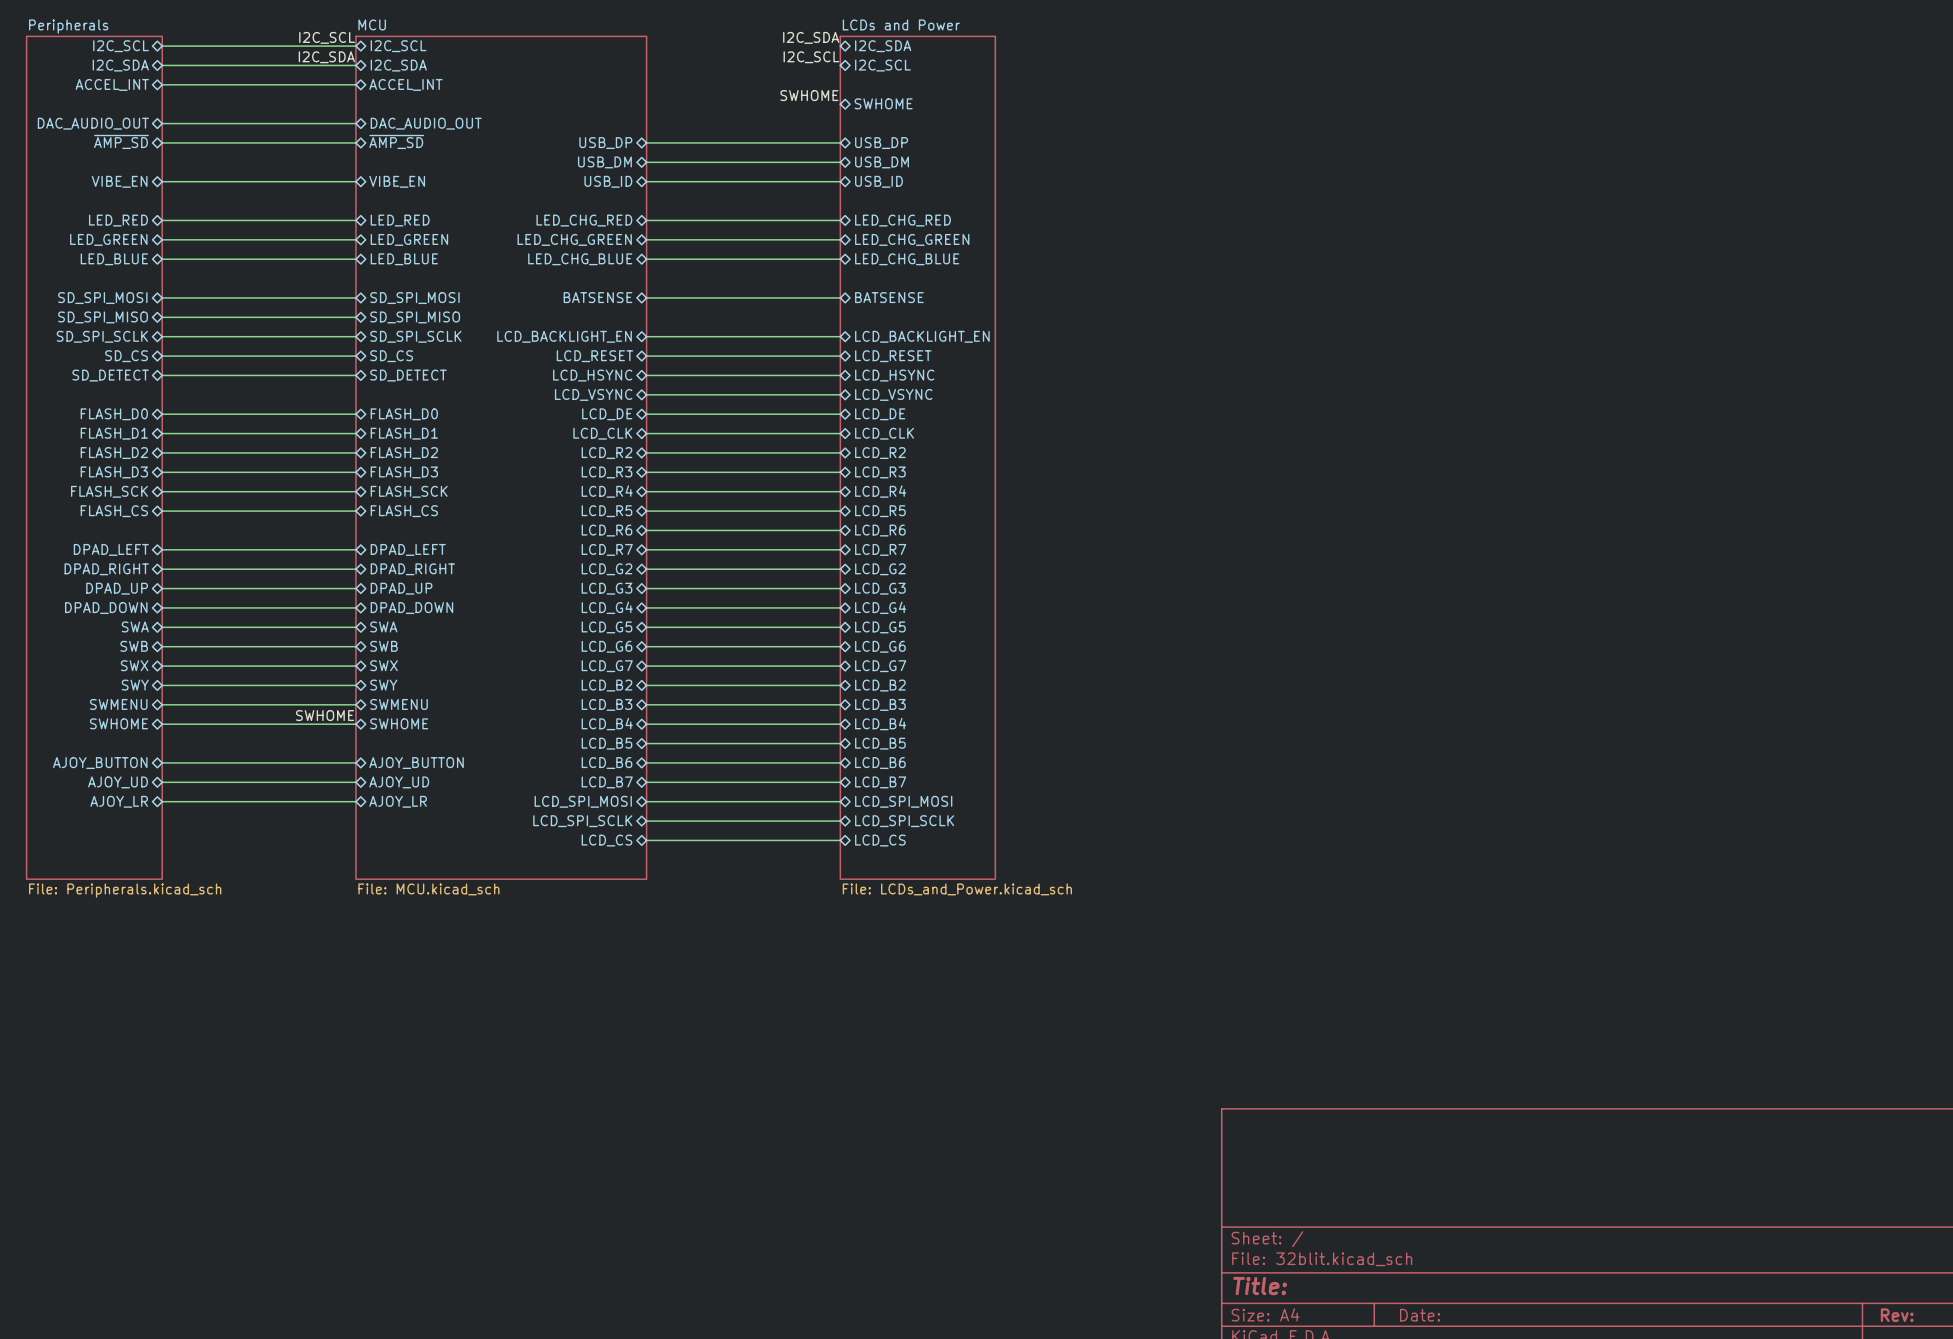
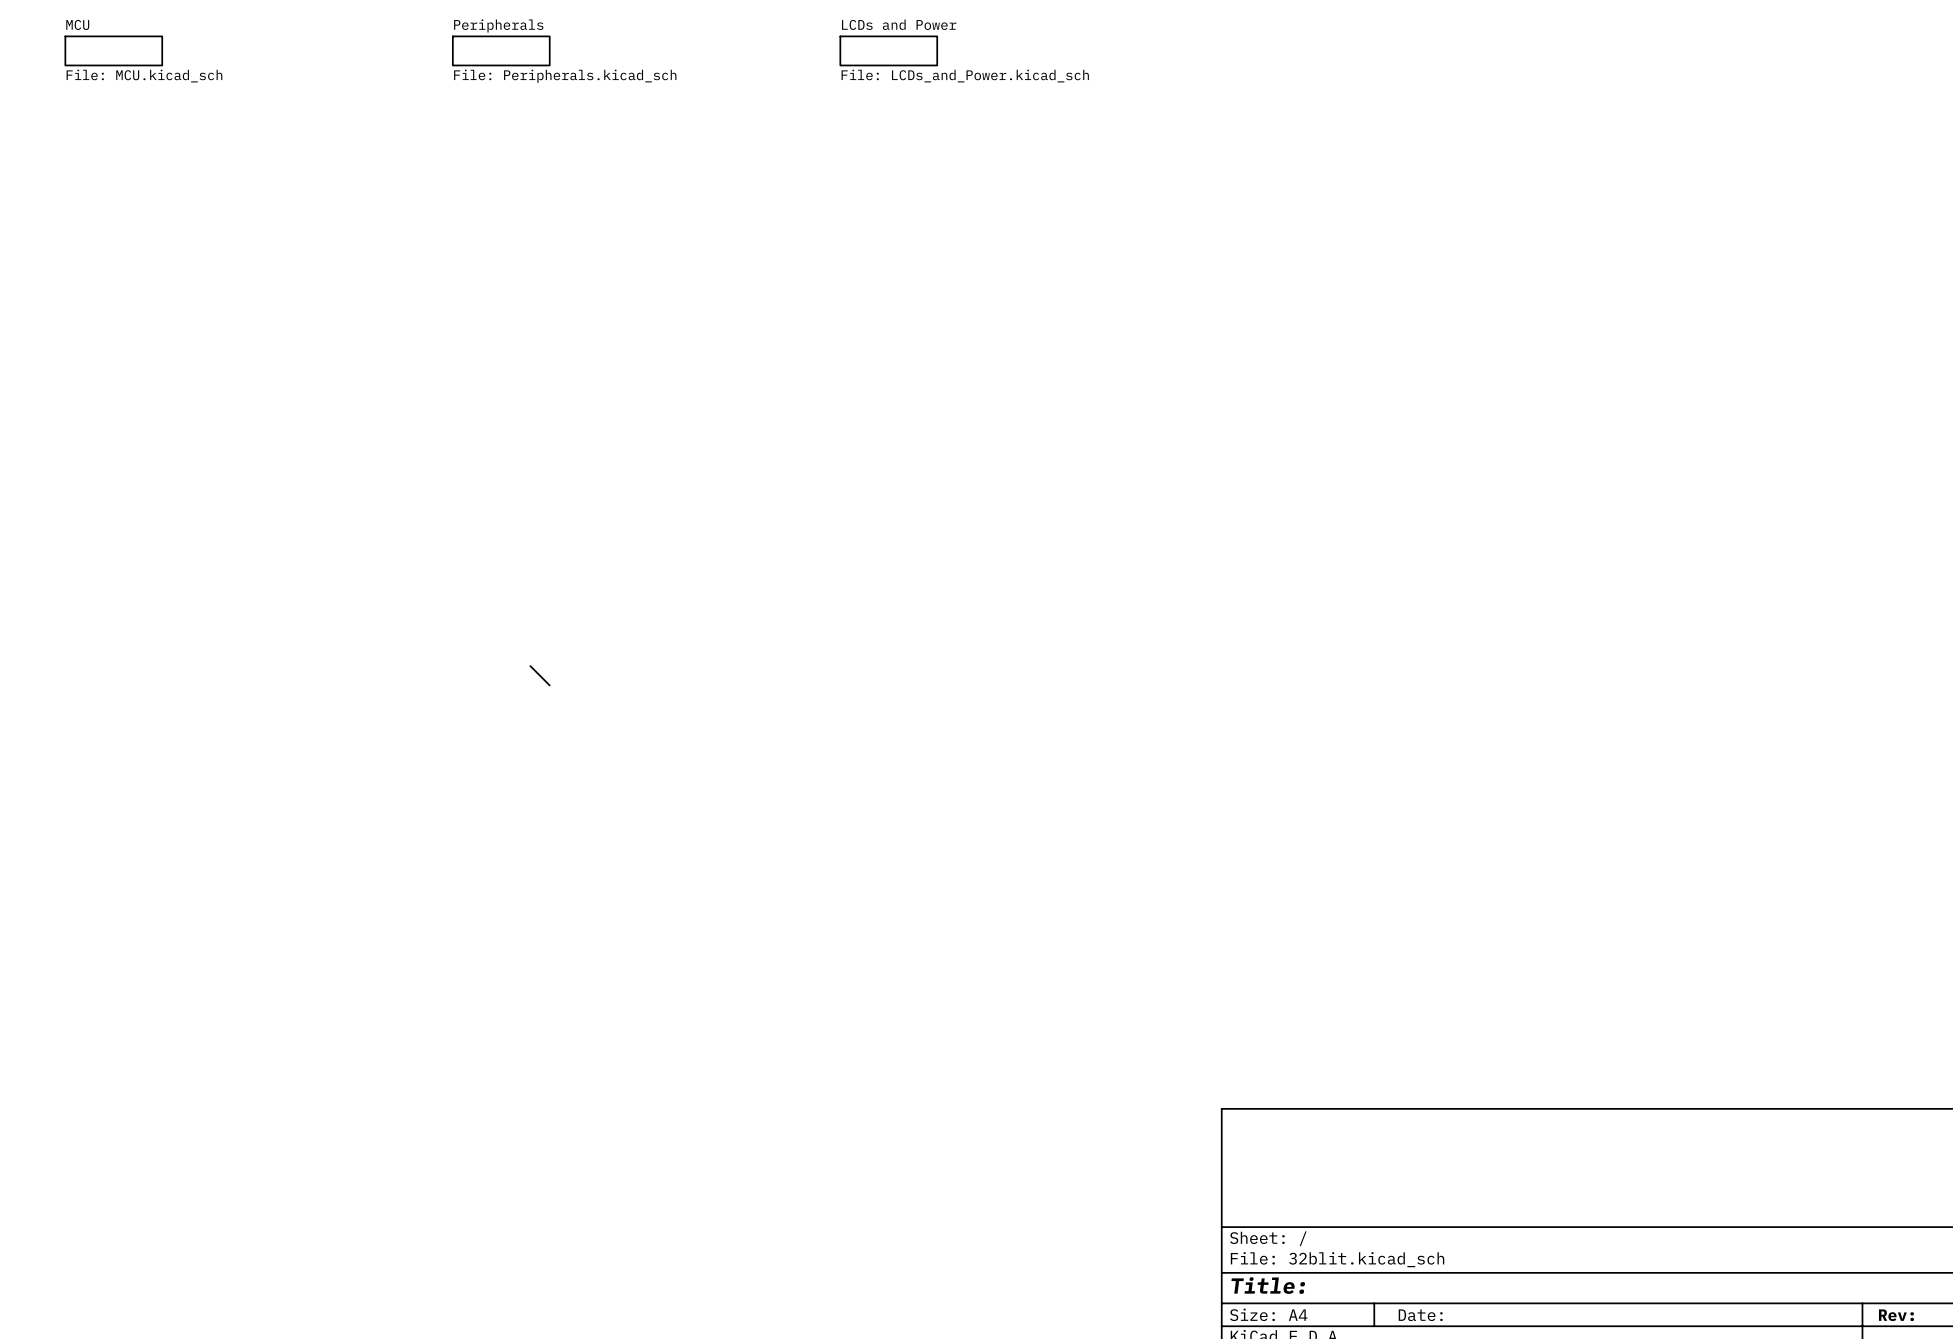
label: I2C_SCL (327, 37) -> none
label: I2C_SDA (811, 37) -> none
sheet pin: I2C_SCL (121, 46) -> none
wire: (162, 46) (355, 46) -> none
sheet pin: I2C_SCL (398, 46) -> none
sheet pin: I2C_SDA (883, 46) -> none
sheet MCU: none -> File: MCU.kicad_sch (113, 50)
sheet Peripherals: none -> File: Peripherals.kicad_sch (501, 50)
sheet LCDs and Power: none -> File: LCDs_and_Power.kicad_sch (888, 50)
label: I2C_SDA (326, 57) -> none
label: I2C_SCL (811, 57) -> none
sheet pin: I2C_SDA (120, 65) -> none
wire: (162, 65) (355, 65) -> none
sheet pin: I2C_SDA (398, 65) -> none
sheet pin: I2C_SCL (882, 65) -> none
sheet pin: ACCEL_INT (112, 84) -> none
wire: (162, 84) (355, 84) -> none
sheet pin: ACCEL_INT (405, 84) -> none
label: SWHOME (809, 95) -> none
sheet pin: SWHOME (883, 103) -> none
sheet pin: DAC_AUDIO_OUT (93, 123) -> none
wire: (162, 123) (355, 123) -> none
sheet pin: DAC_AUDIO_OUT (426, 123) -> none
sheet pin: ~{AMP_SD} (121, 141) -> none
sheet pin: ~{AMP_SD} (396, 141) -> none
wire: (162, 142) (355, 142) -> none
wire: (646, 142) (840, 142) -> none
sheet pin: USB_DP (605, 143) -> none
sheet pin: USB_DP (881, 143) -> none
sheet pin: USB_DM (604, 162) -> none
wire: (646, 162) (840, 162) -> none
sheet pin: USB_DM (882, 162) -> none
sheet pin: VIBE_EN (119, 181) -> none
wire: (162, 181) (355, 181) -> none
sheet pin: VIBE_EN (397, 181) -> none
sheet pin: USB_ID (608, 181) -> none
wire: (646, 181) (840, 181) -> none
sheet pin: USB_ID (879, 181) -> none
sheet pin: LED_RED (118, 220) -> none
wire: (162, 220) (355, 220) -> none
sheet pin: LED_RED (400, 220) -> none
sheet pin: LED_CHG_RED (584, 220) -> none
wire: (646, 220) (840, 220) -> none
sheet pin: LED_CHG_RED (903, 220) -> none
sheet pin: LED_GREEN (108, 239) -> none
wire: (162, 239) (355, 239) -> none
sheet pin: LED_GREEN (409, 239) -> none
sheet pin: LED_CHG_GREEN (574, 239) -> none
wire: (646, 239) (840, 239) -> none
sheet pin: LED_CHG_GREEN (912, 239) -> none
sheet pin: LED_BLUE (114, 259) -> none
wire: (162, 259) (355, 259) -> none
sheet pin: LED_BLUE (404, 259) -> none
sheet pin: LED_CHG_BLUE (580, 259) -> none
wire: (646, 259) (840, 259) -> none
sheet pin: LED_CHG_BLUE (907, 259) -> none
wire: (162, 297) (355, 297) -> none
sheet pin: BATSENSE (598, 297) -> none
wire: (646, 297) (840, 297) -> none
sheet pin: BATSENSE (889, 297) -> none
sheet pin: SD_SPI_MOSI (102, 298) -> none
sheet pin: SD_SPI_MOSI (414, 298) -> none
sheet pin: SD_SPI_MISO (103, 317) -> none
wire: (162, 317) (355, 317) -> none
sheet pin: SD_SPI_MISO (415, 317) -> none
sheet pin: SD_SPI_SCLK (102, 336) -> none
wire: (162, 336) (355, 336) -> none
sheet pin: SD_SPI_SCLK (415, 336) -> none
sheet pin: LCD_BACKLIGHT_EN (564, 336) -> none
wire: (646, 336) (840, 336) -> none
sheet pin: LCD_BACKLIGHT_EN (922, 336) -> none
sheet pin: SD_CS (126, 356) -> none
wire: (162, 356) (355, 356) -> none
sheet pin: SD_CS (391, 356) -> none
sheet pin: LCD_RESET (595, 356) -> none
wire: (646, 356) (840, 356) -> none
sheet pin: LCD_RESET (893, 356) -> none
sheet pin: SD_DETECT (110, 375) -> none
wire: (162, 375) (355, 375) -> none
sheet pin: SD_DETECT (408, 375) -> none
sheet pin: LCD_HSYNC (592, 375) -> none
wire: (646, 375) (840, 375) -> none
sheet pin: LCD_HSYNC (894, 375) -> none
sheet pin: LCD_VSYNC (593, 394) -> none
wire: (646, 394) (840, 394) -> none
sheet pin: LCD_VSYNC (893, 394) -> none
sheet pin: FLASH_D0 (114, 414) -> none
wire: (162, 414) (355, 414) -> none
sheet pin: FLASH_D0 (404, 414) -> none
sheet pin: LCD_DE (607, 414) -> none
wire: (646, 414) (840, 414) -> none
sheet pin: LCD_DE (880, 414) -> none
sheet pin: FLASH_D1 (114, 433) -> none
wire: (162, 433) (355, 433) -> none
sheet pin: FLASH_D1 (404, 433) -> none
sheet pin: LCD_CLK (602, 433) -> none
wire: (646, 433) (840, 433) -> none
sheet pin: LCD_CLK (884, 433) -> none
wire: (162, 452) (355, 452) -> none
wire: (646, 452) (840, 452) -> none
sheet pin: FLASH_D2 (114, 453) -> none
sheet pin: FLASH_D2 (404, 453) -> none
sheet pin: LCD_R2 (607, 453) -> none
sheet pin: LCD_R2 (880, 453) -> none
sheet Peripherals: File: Peripherals.kicad_sch (94, 457) -> none
sheet MCU: File: MCU.kicad_sch (501, 457) -> none
sheet LCDs and Power: File: LCDs_and_Power.kicad_sch (917, 457) -> none
sheet pin: FLASH_D3 (114, 472) -> none
wire: (162, 472) (355, 472) -> none
sheet pin: FLASH_D3 (404, 472) -> none
sheet pin: LCD_R3 (607, 472) -> none
wire: (646, 472) (840, 472) -> none
sheet pin: LCD_R3 (880, 472) -> none
sheet pin: FLASH_SCK (109, 491) -> none
wire: (162, 491) (355, 491) -> none
sheet pin: FLASH_SCK (409, 491) -> none
sheet pin: LCD_R4 (607, 491) -> none
wire: (646, 491) (840, 491) -> none
sheet pin: LCD_R4 (880, 491) -> none
sheet pin: FLASH_CS (114, 511) -> none
wire: (162, 511) (355, 511) -> none
sheet pin: FLASH_CS (404, 511) -> none
sheet pin: LCD_R5 (607, 511) -> none
wire: (646, 511) (840, 511) -> none
sheet pin: LCD_R5 (880, 511) -> none
sheet pin: LCD_R6 (607, 530) -> none
wire: (646, 530) (840, 530) -> none
sheet pin: LCD_R6 (880, 530) -> none
sheet pin: DPAD_LEFT (111, 549) -> none
wire: (162, 549) (355, 549) -> none
sheet pin: DPAD_LEFT (408, 549) -> none
sheet pin: LCD_R7 (607, 549) -> none
wire: (646, 549) (840, 549) -> none
sheet pin: LCD_R7 (880, 549) -> none
sheet pin: DPAD_RIGHT (106, 569) -> none
wire: (162, 569) (355, 569) -> none
sheet pin: DPAD_RIGHT (412, 569) -> none
sheet pin: LCD_G2 (607, 569) -> none
wire: (646, 569) (840, 569) -> none
sheet pin: LCD_G2 (880, 569) -> none
sheet pin: DPAD_UP (117, 588) -> none
wire: (162, 588) (355, 588) -> none
sheet pin: DPAD_UP (401, 588) -> none
sheet pin: LCD_G3 (607, 588) -> none
wire: (646, 588) (840, 588) -> none
sheet pin: LCD_G3 (880, 588) -> none
wire: (162, 607) (355, 607) -> none
sheet pin: LCD_G4 (607, 607) -> none
wire: (646, 607) (840, 607) -> none
sheet pin: LCD_G4 (880, 607) -> none
sheet pin: DPAD_DOWN (106, 608) -> none
sheet pin: DPAD_DOWN (411, 608) -> none
sheet pin: SWA (135, 626) -> none
sheet pin: SWA (383, 626) -> none
wire: (162, 627) (355, 627) -> none
sheet pin: LCD_G5 (607, 627) -> none
wire: (646, 627) (840, 627) -> none
sheet pin: LCD_G5 (880, 627) -> none
sheet pin: SWB (134, 646) -> none
wire: (162, 646) (355, 646) -> none
sheet pin: SWB (384, 646) -> none
sheet pin: LCD_G6 (607, 646) -> none
wire: (646, 646) (840, 646) -> none
sheet pin: LCD_G6 (880, 646) -> none
sheet pin: SWX (134, 665) -> none
sheet pin: SWX (384, 665) -> none
wire: (162, 666) (355, 666) -> none
wire: none -> (530, 666) (549, 685)
sheet pin: LCD_G7 (607, 666) -> none
wire: (646, 666) (840, 666) -> none
sheet pin: LCD_G7 (880, 666) -> none
sheet pin: SWY (135, 685) -> none
wire: (162, 685) (355, 685) -> none
sheet pin: SWY (383, 685) -> none
sheet pin: LCD_B2 (607, 685) -> none
wire: (646, 685) (840, 685) -> none
sheet pin: LCD_B2 (880, 685) -> none
sheet pin: SWMENU (118, 704) -> none
wire: (162, 704) (355, 704) -> none
sheet pin: SWMENU (399, 704) -> none
sheet pin: LCD_B3 (607, 704) -> none
wire: (646, 704) (840, 704) -> none
sheet pin: LCD_B3 (880, 704) -> none
label: SWHOME (324, 715) -> none
sheet pin: SWHOME (118, 723) -> none
sheet pin: SWHOME (399, 723) -> none
wire: (162, 724) (355, 724) -> none
sheet pin: LCD_B4 (607, 724) -> none
wire: (646, 724) (840, 724) -> none
sheet pin: LCD_B4 (880, 724) -> none
sheet pin: LCD_B5 (607, 743) -> none
wire: (646, 743) (840, 743) -> none
sheet pin: LCD_B5 (880, 743) -> none
wire: (162, 762) (355, 762) -> none
wire: (646, 762) (840, 762) -> none
sheet pin: AJOY_BUTTON (100, 763) -> none
sheet pin: AJOY_BUTTON (416, 763) -> none
sheet pin: LCD_B6 (607, 763) -> none
sheet pin: LCD_B6 (880, 763) -> none
sheet pin: AJOY_UD (118, 782) -> none
wire: (162, 782) (355, 782) -> none
sheet pin: AJOY_UD (399, 782) -> none
sheet pin: LCD_B7 (607, 782) -> none
wire: (646, 782) (840, 782) -> none
sheet pin: LCD_B7 (880, 782) -> none
sheet pin: AJOY_LR (119, 801) -> none
wire: (162, 801) (355, 801) -> none
sheet pin: AJOY_LR (398, 801) -> none
sheet pin: LCD_SPI_MOSI (583, 801) -> none
wire: (646, 801) (840, 801) -> none
sheet pin: LCD_SPI_MOSI (903, 801) -> none
sheet pin: LCD_SPI_SCLK (582, 821) -> none
wire: (646, 821) (840, 821) -> none
sheet pin: LCD_SPI_SCLK (904, 821) -> none
sheet pin: LCD_CS (607, 840) -> none
wire: (646, 840) (840, 840) -> none
sheet pin: LCD_CS (880, 840) -> none

